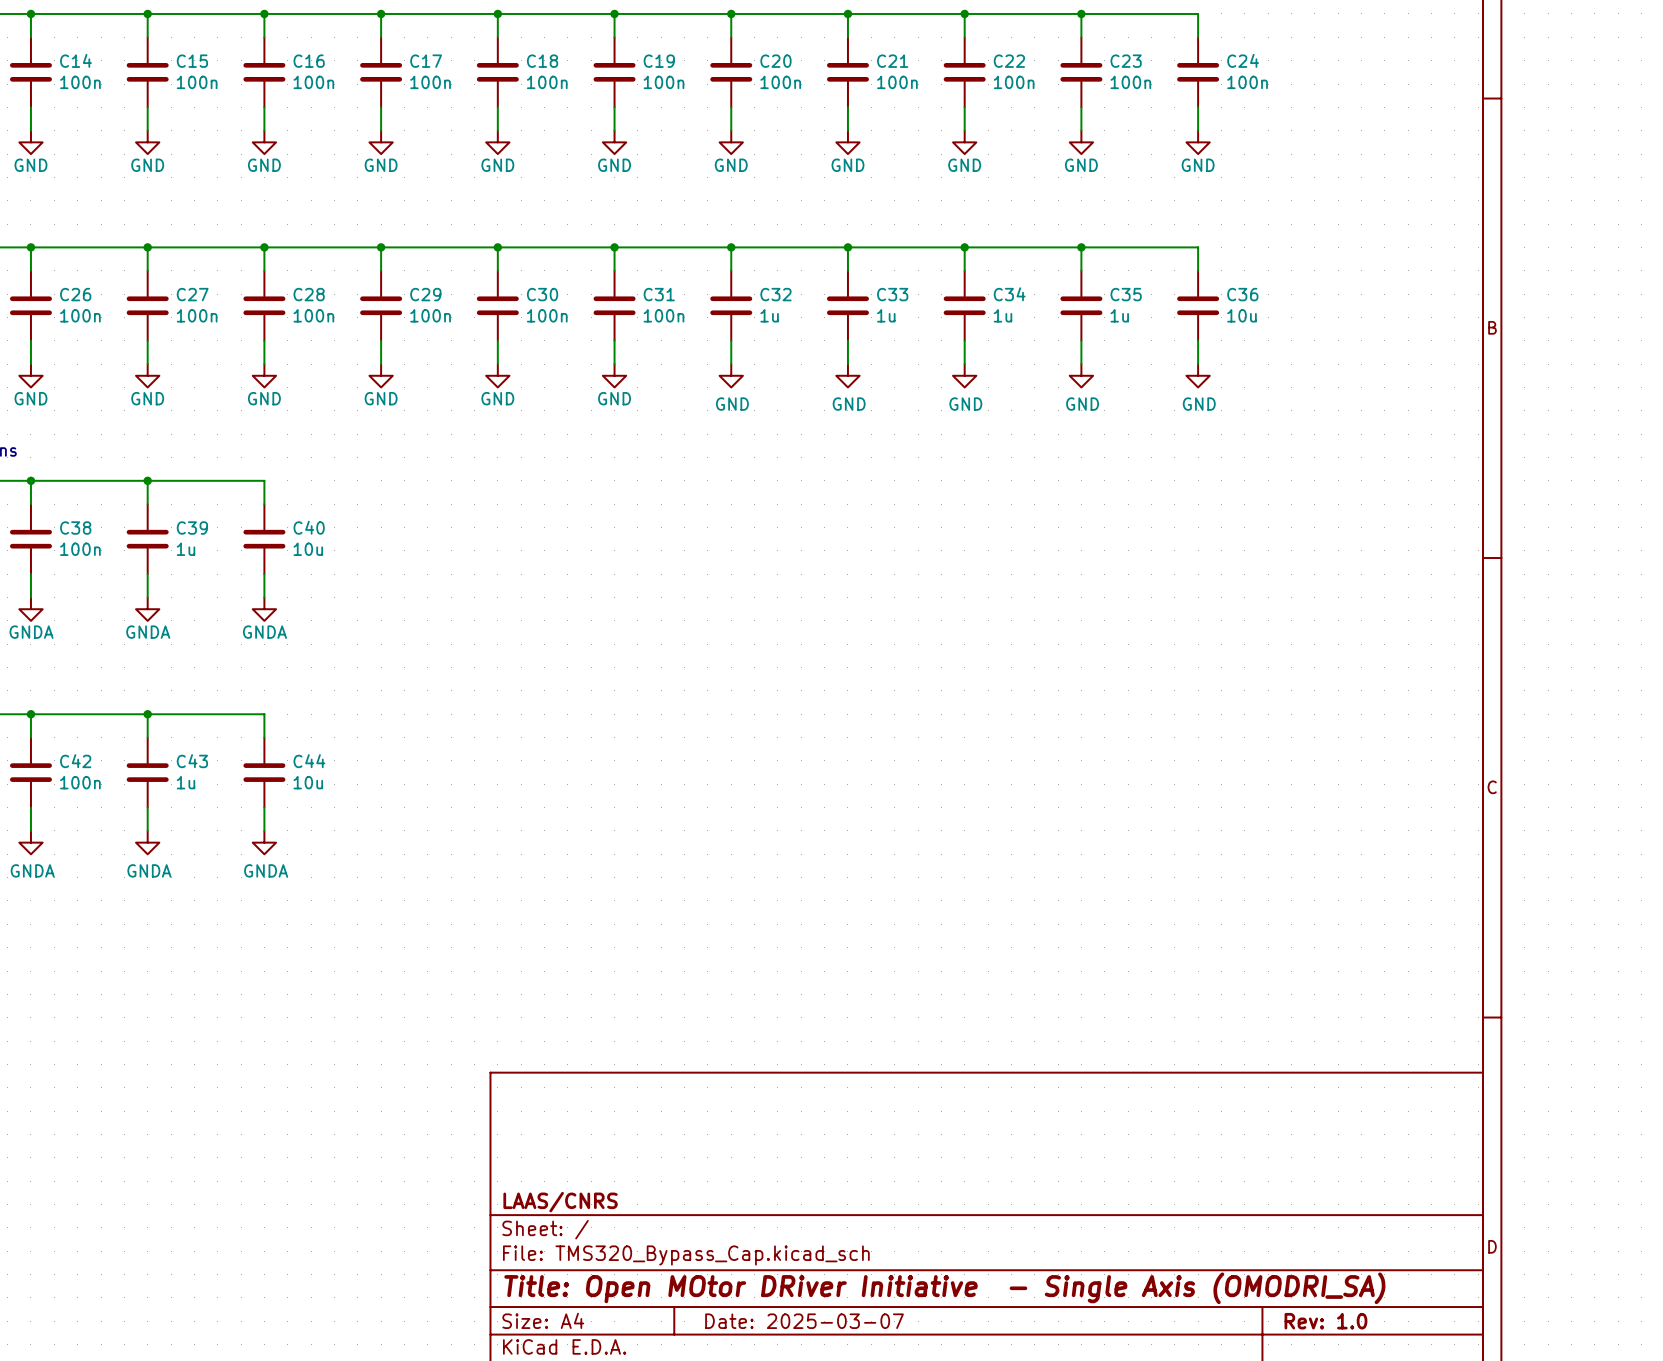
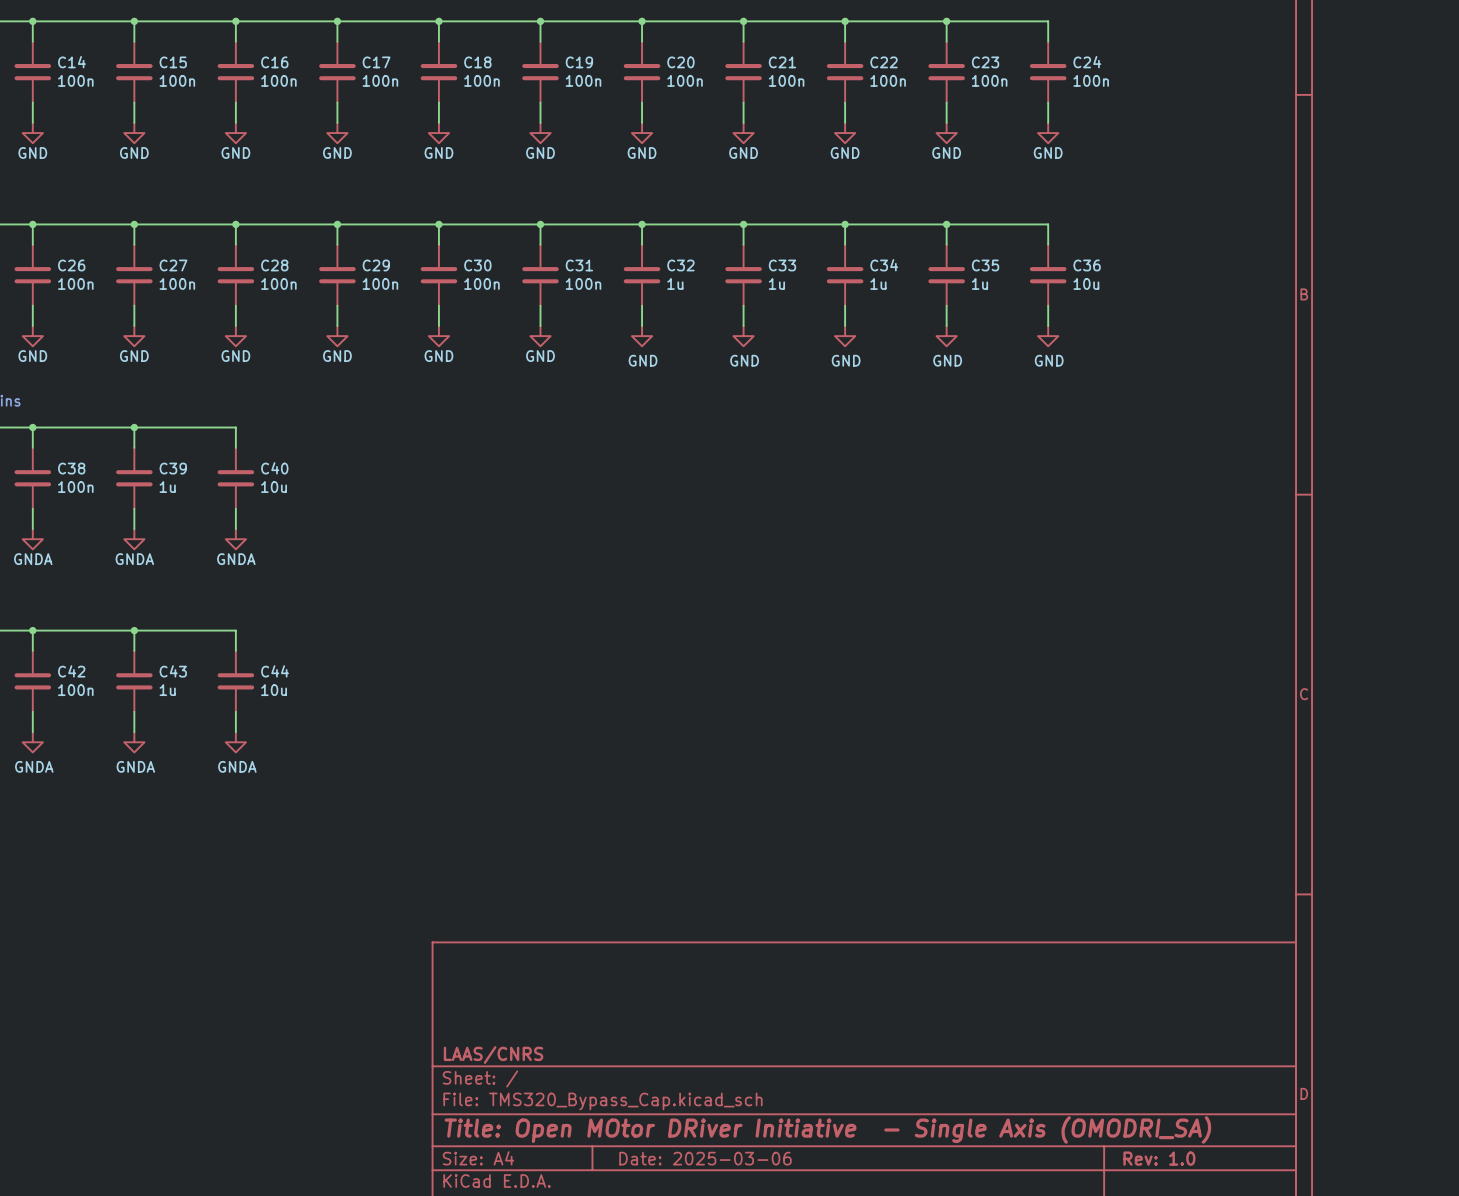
title block: Date: 2025-03-07 (804, 1321) -> Date: 2025-03-06 (705, 1158)

